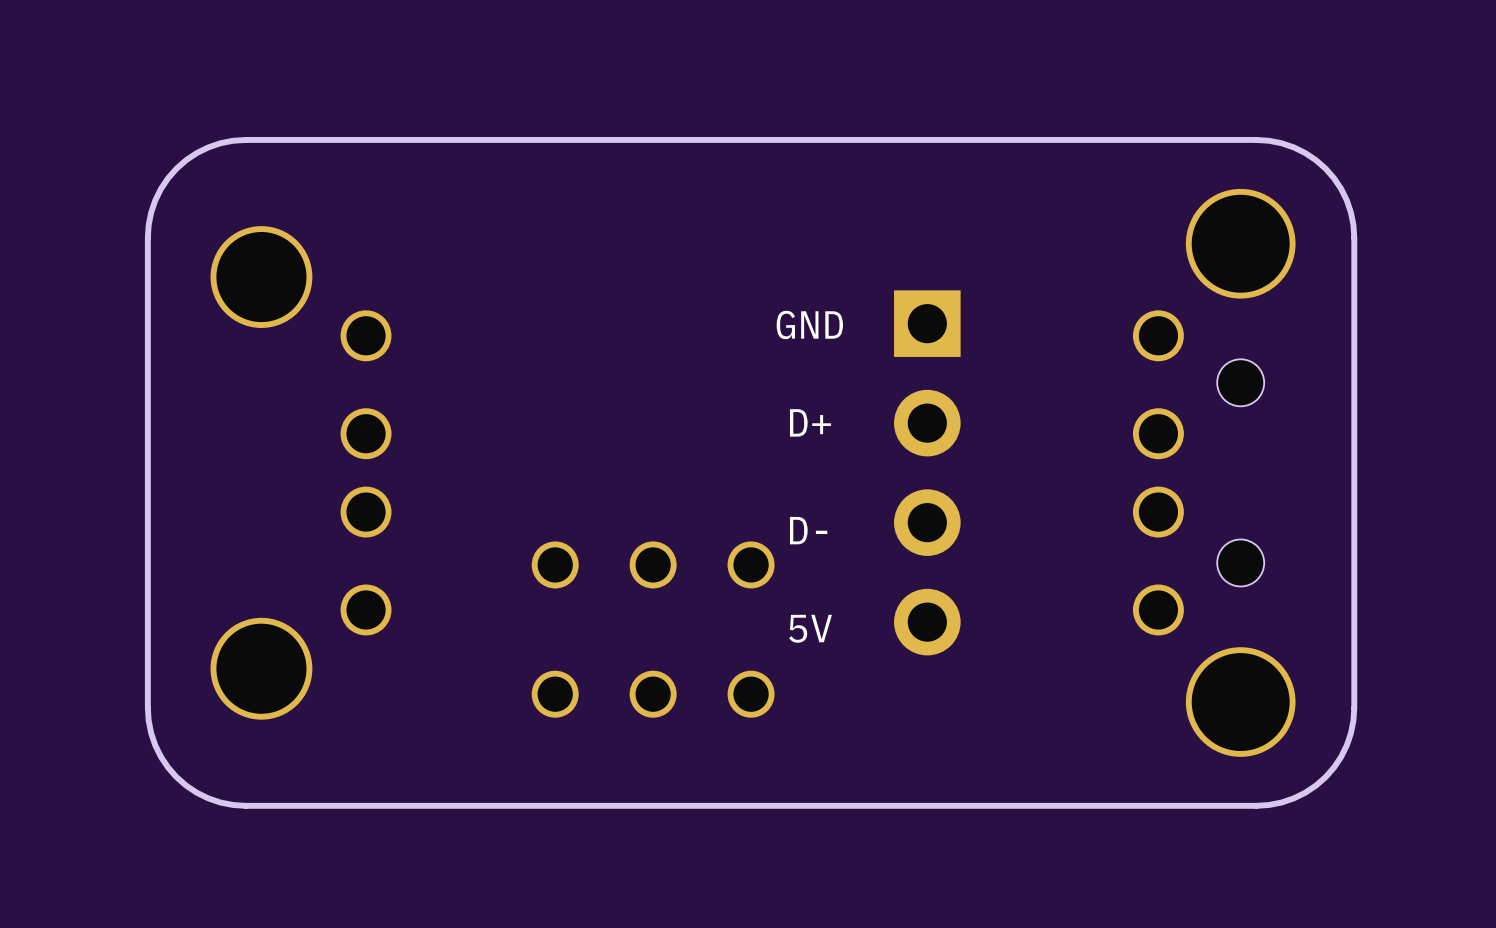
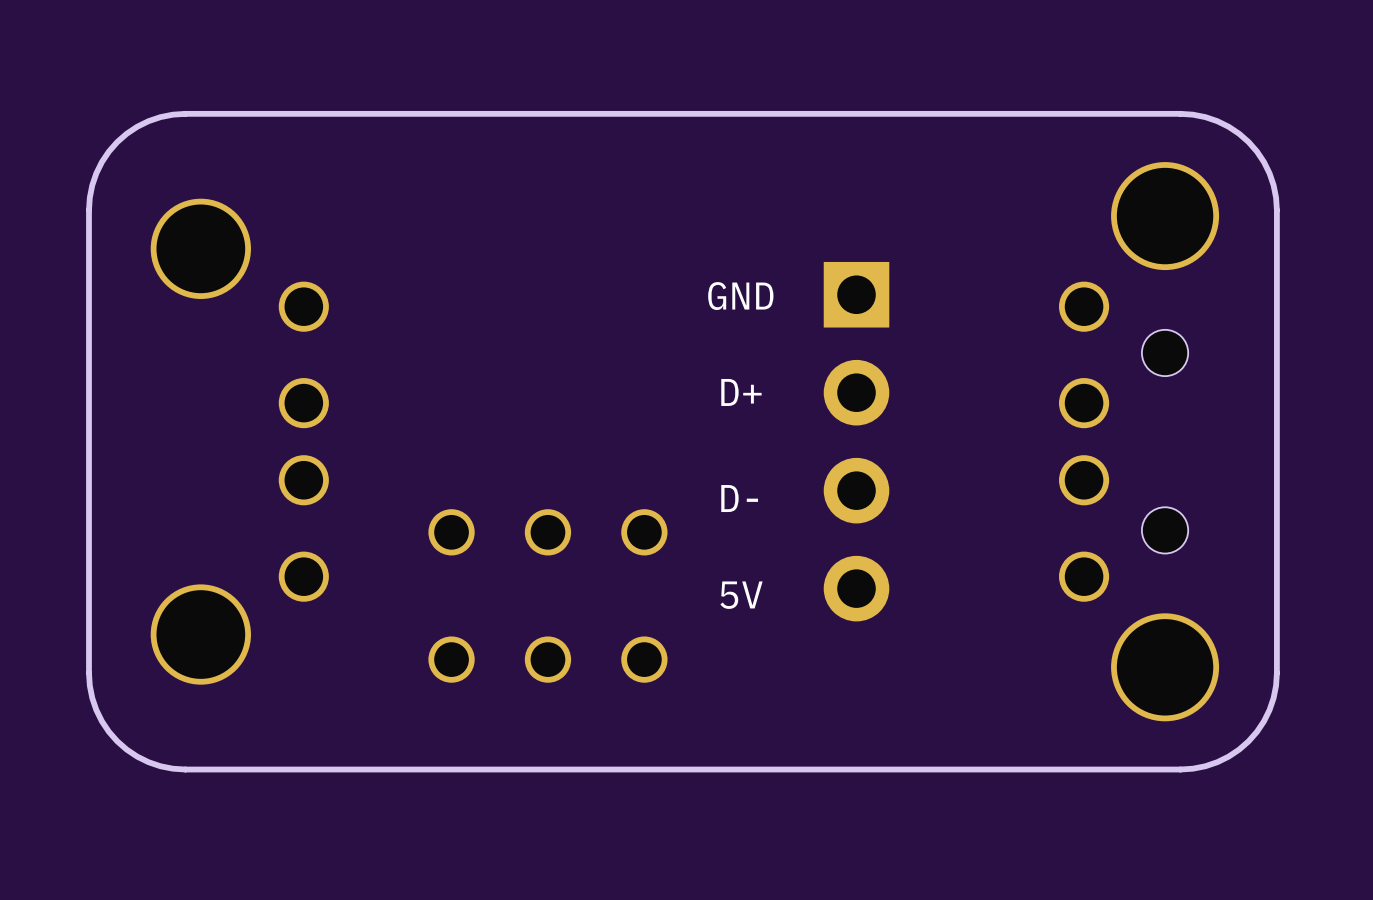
part position: (653, 629) -> (547, 595)

